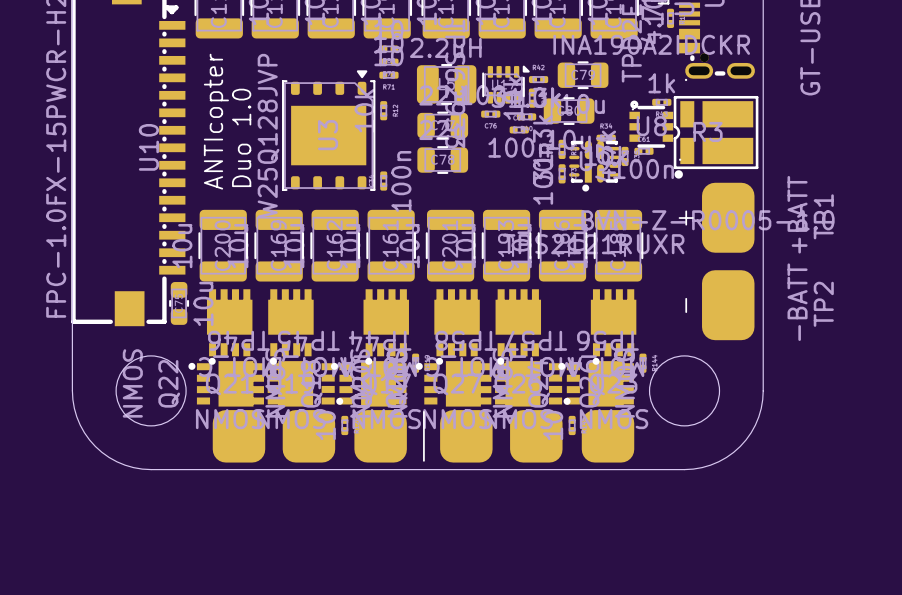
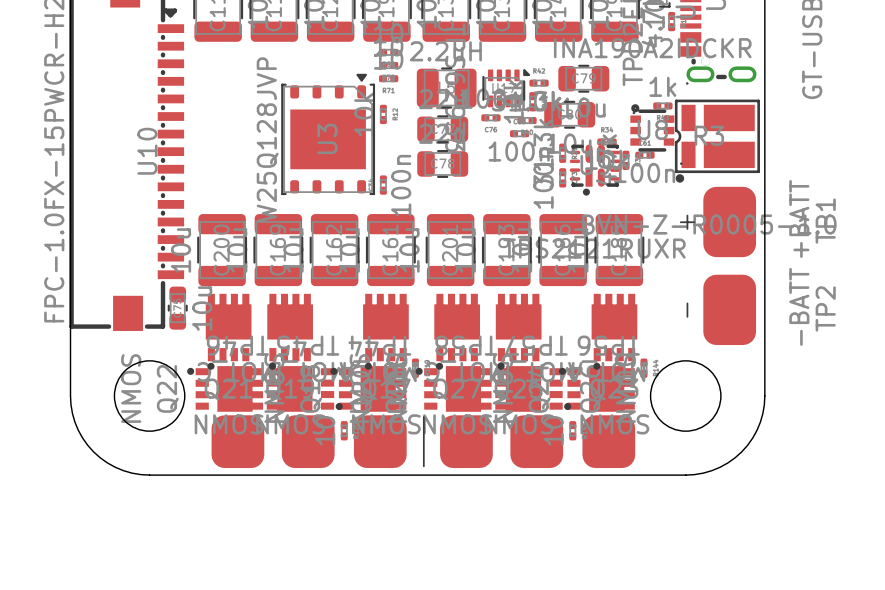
text: ANTIcopter (216, 121) -> none
text: Duo 1.0 (241, 137) -> none

